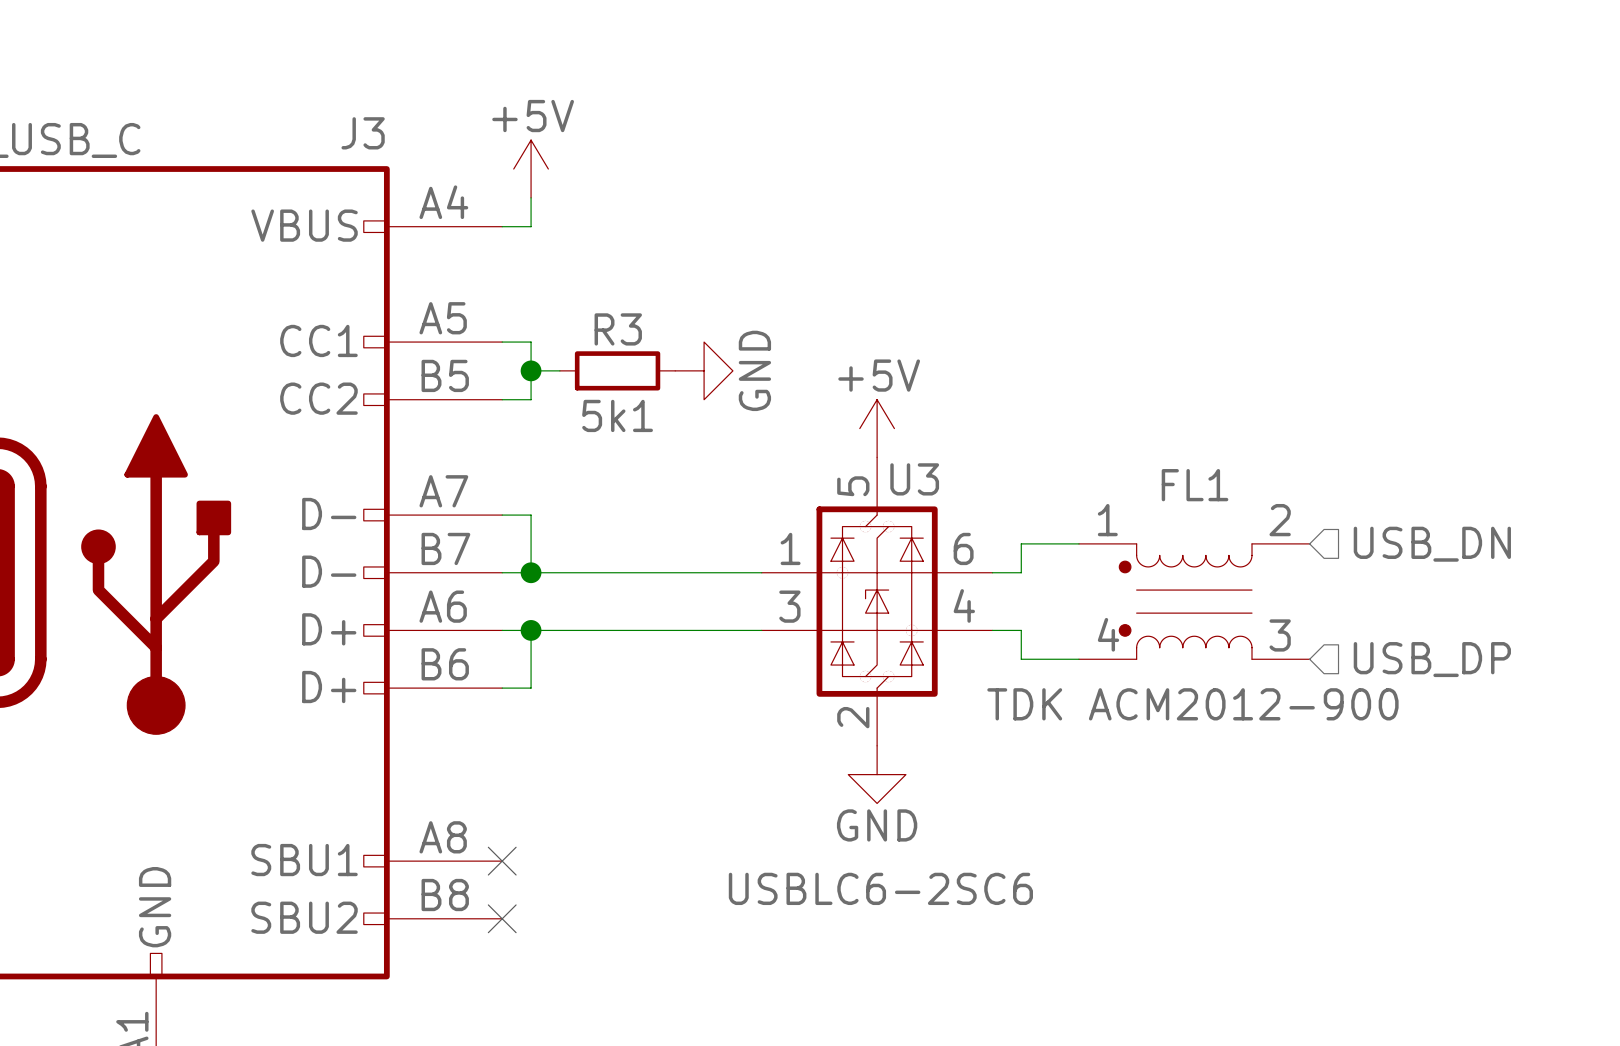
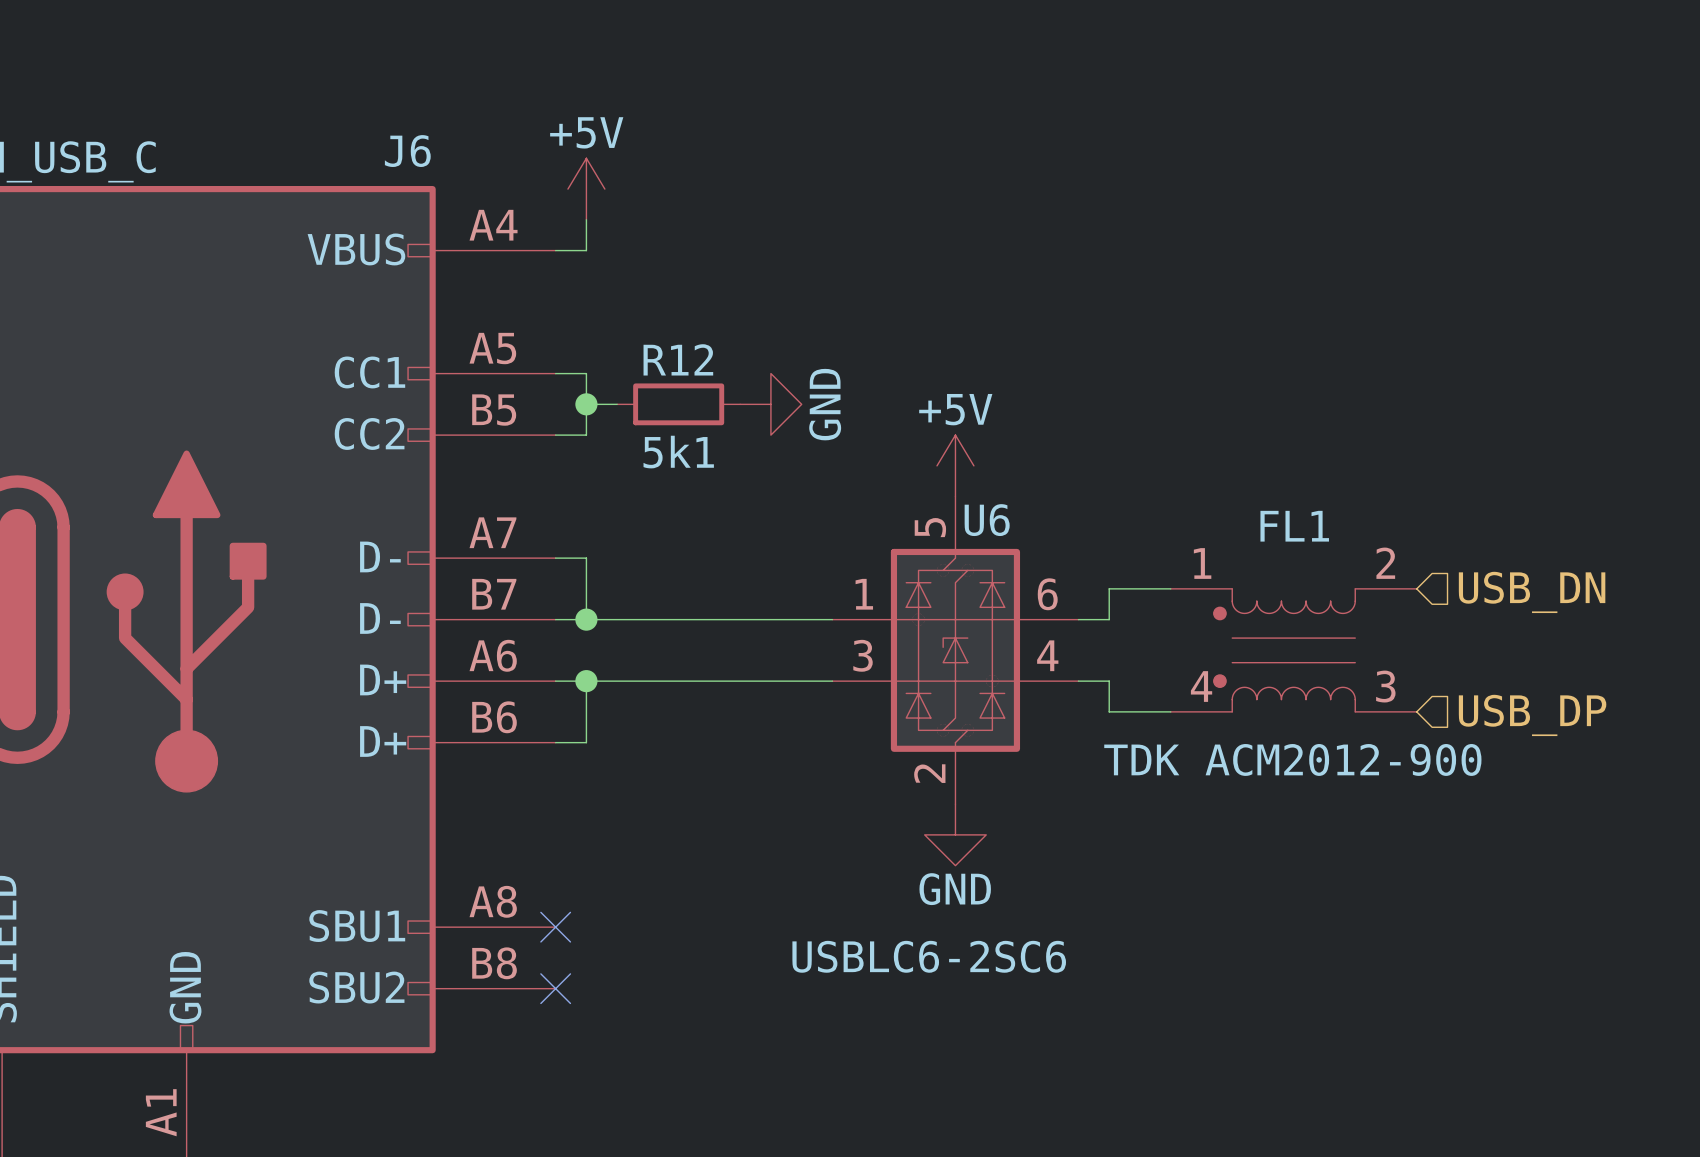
J3 name: J3 (363, 133) -> J6 (407, 151)
R3 name: R3 (618, 329) -> R12 (678, 359)
U3 name: U3 (914, 479) -> U6 (987, 520)

